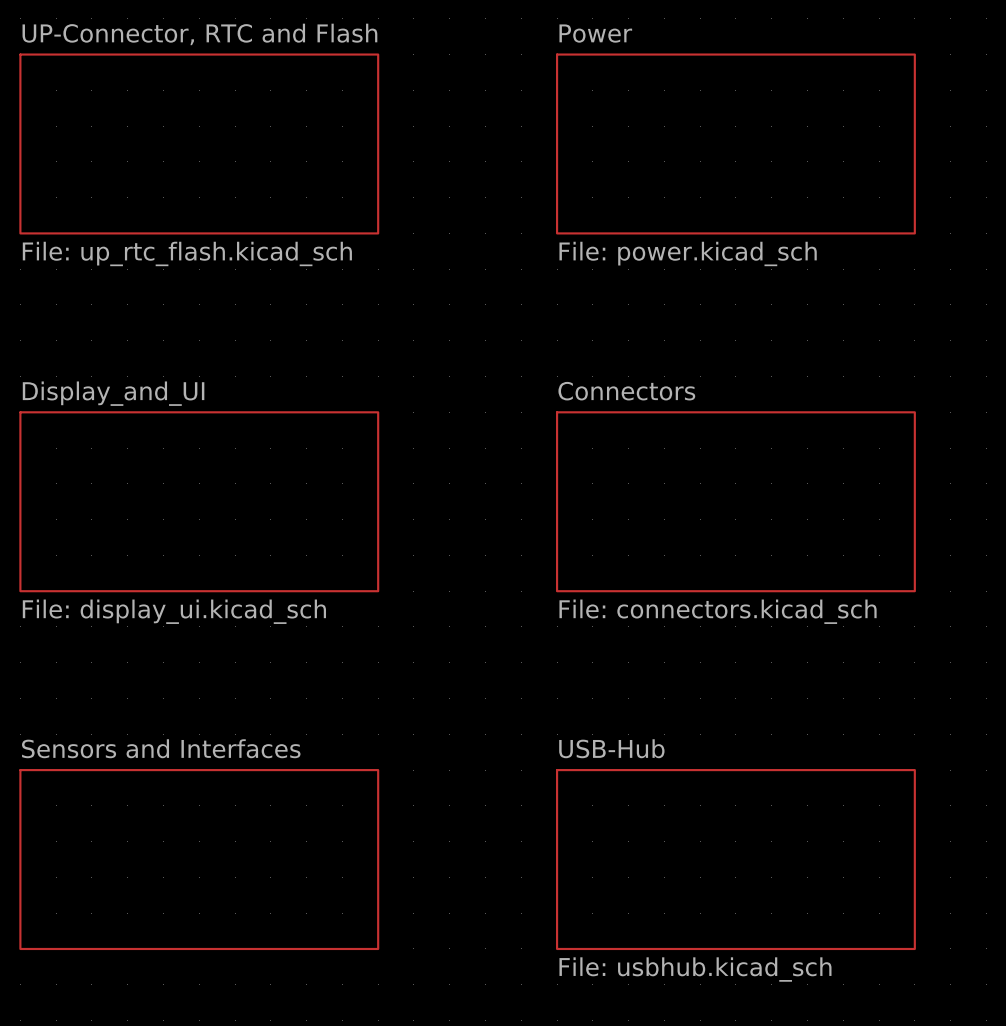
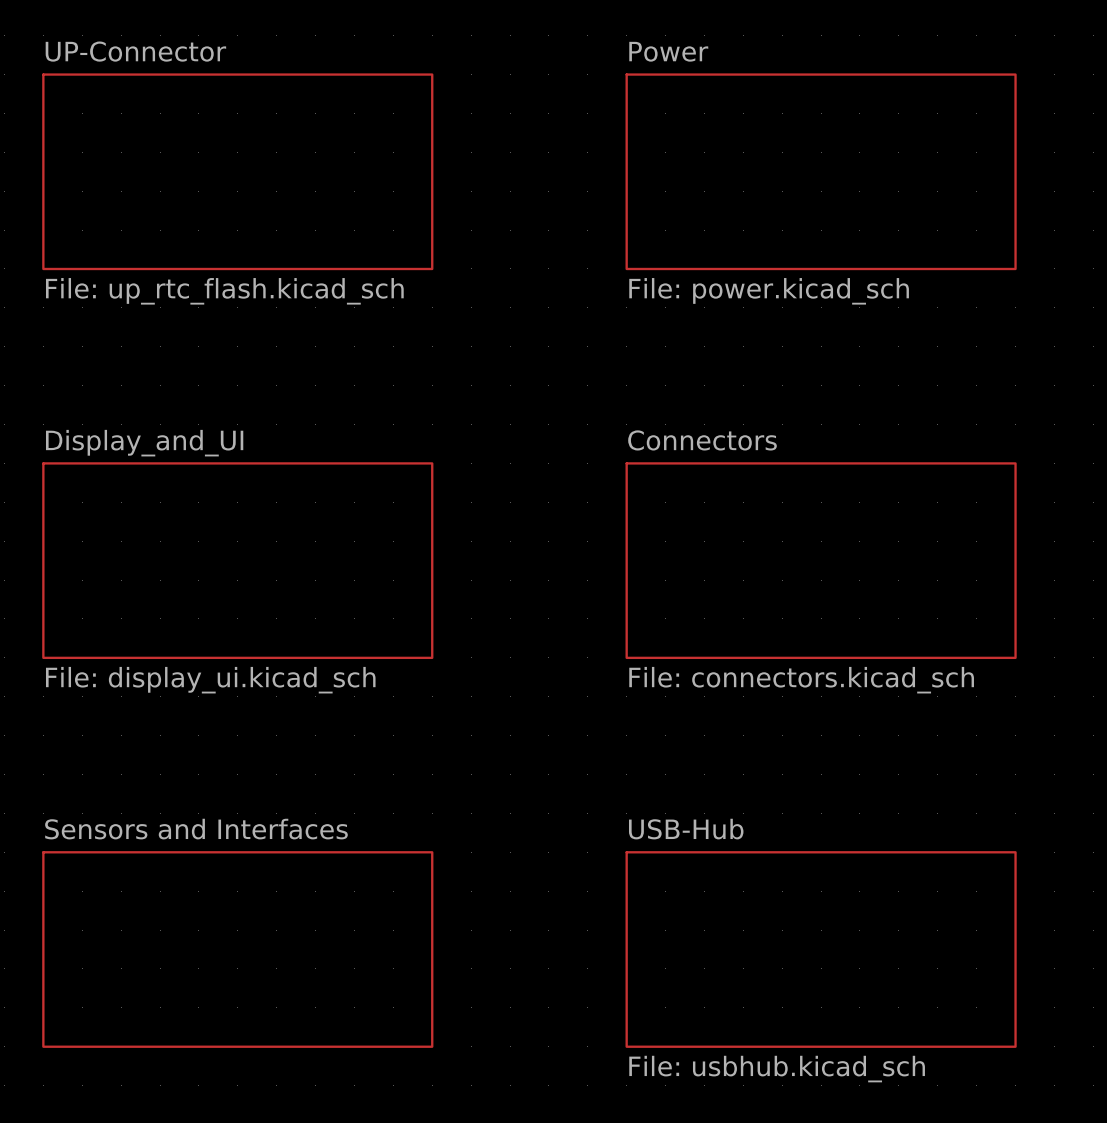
sheet UP-Connector, RTC and Flash name: UP-Connector, RTC and Flash (199, 34) -> UP-Connector (135, 51)

